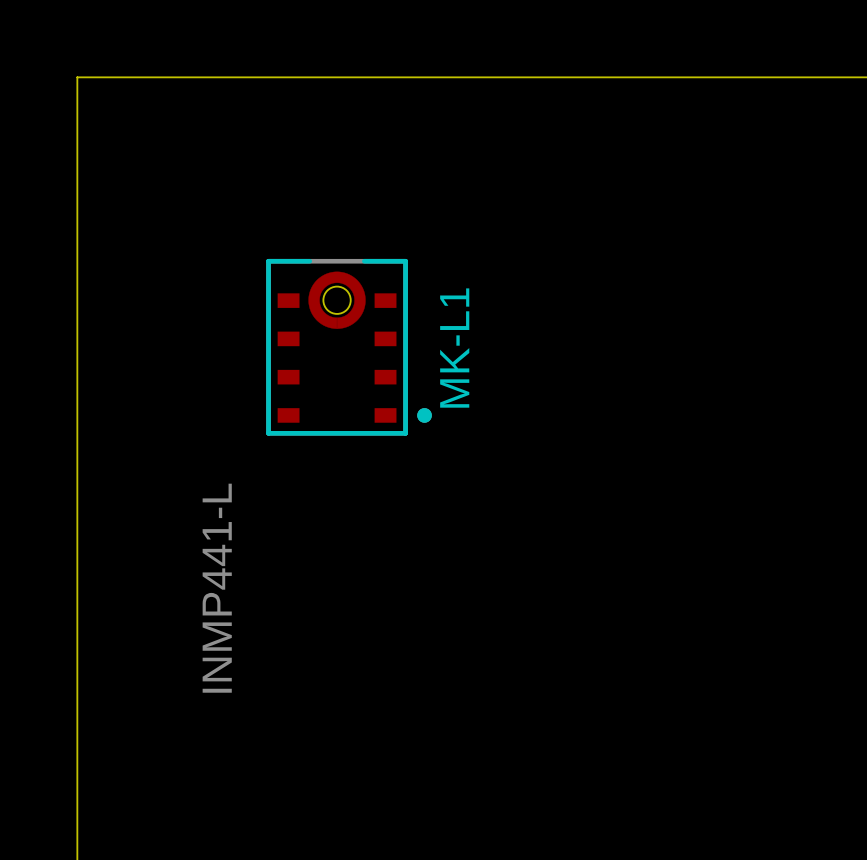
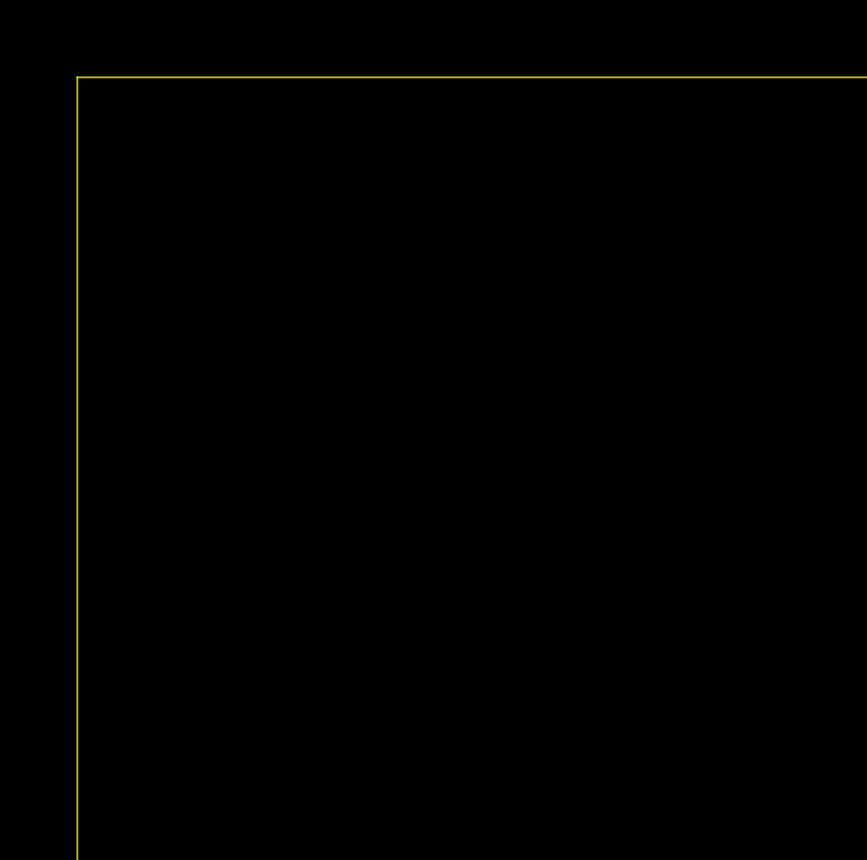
MK-L1: INMP441-L (349, 347) -> none

